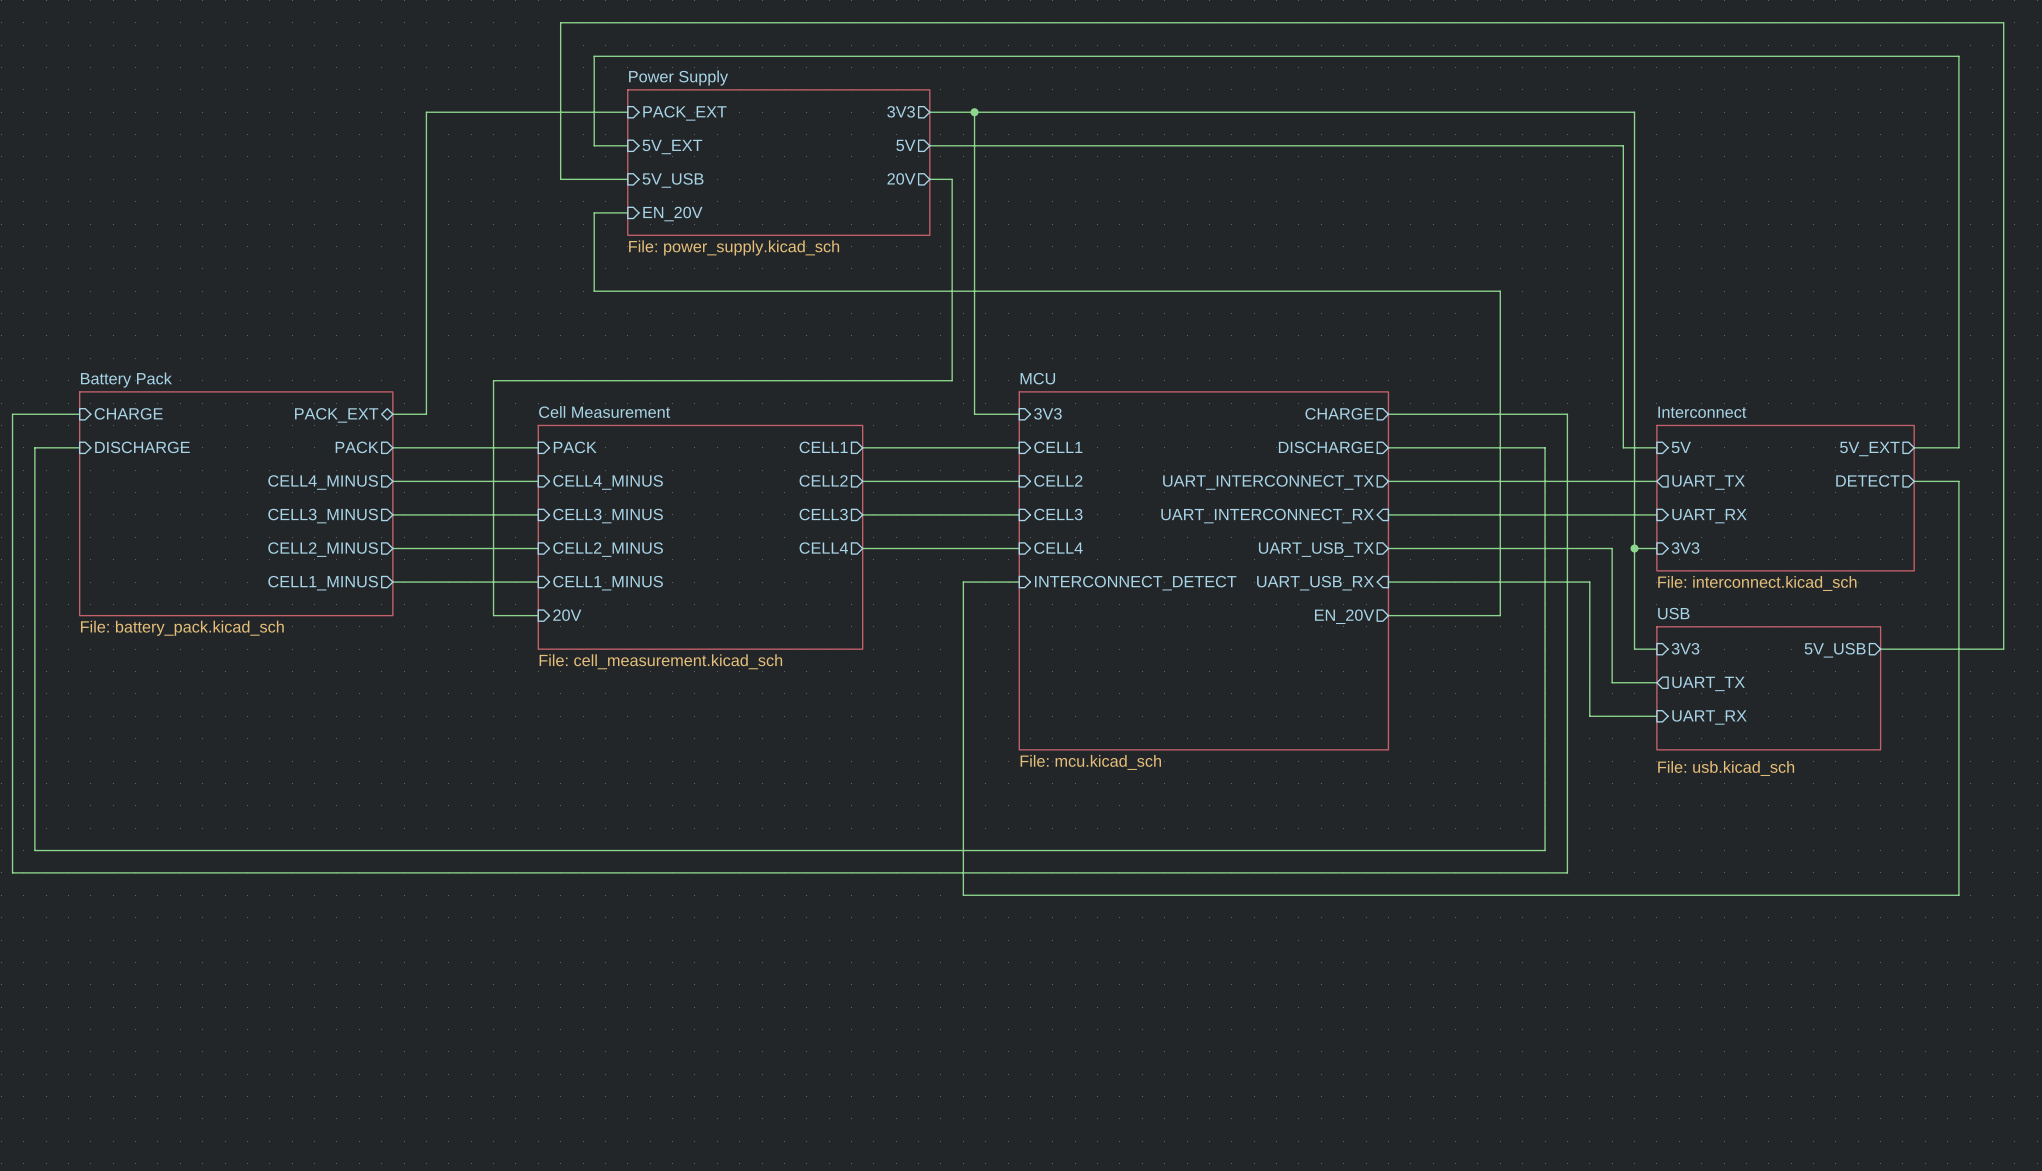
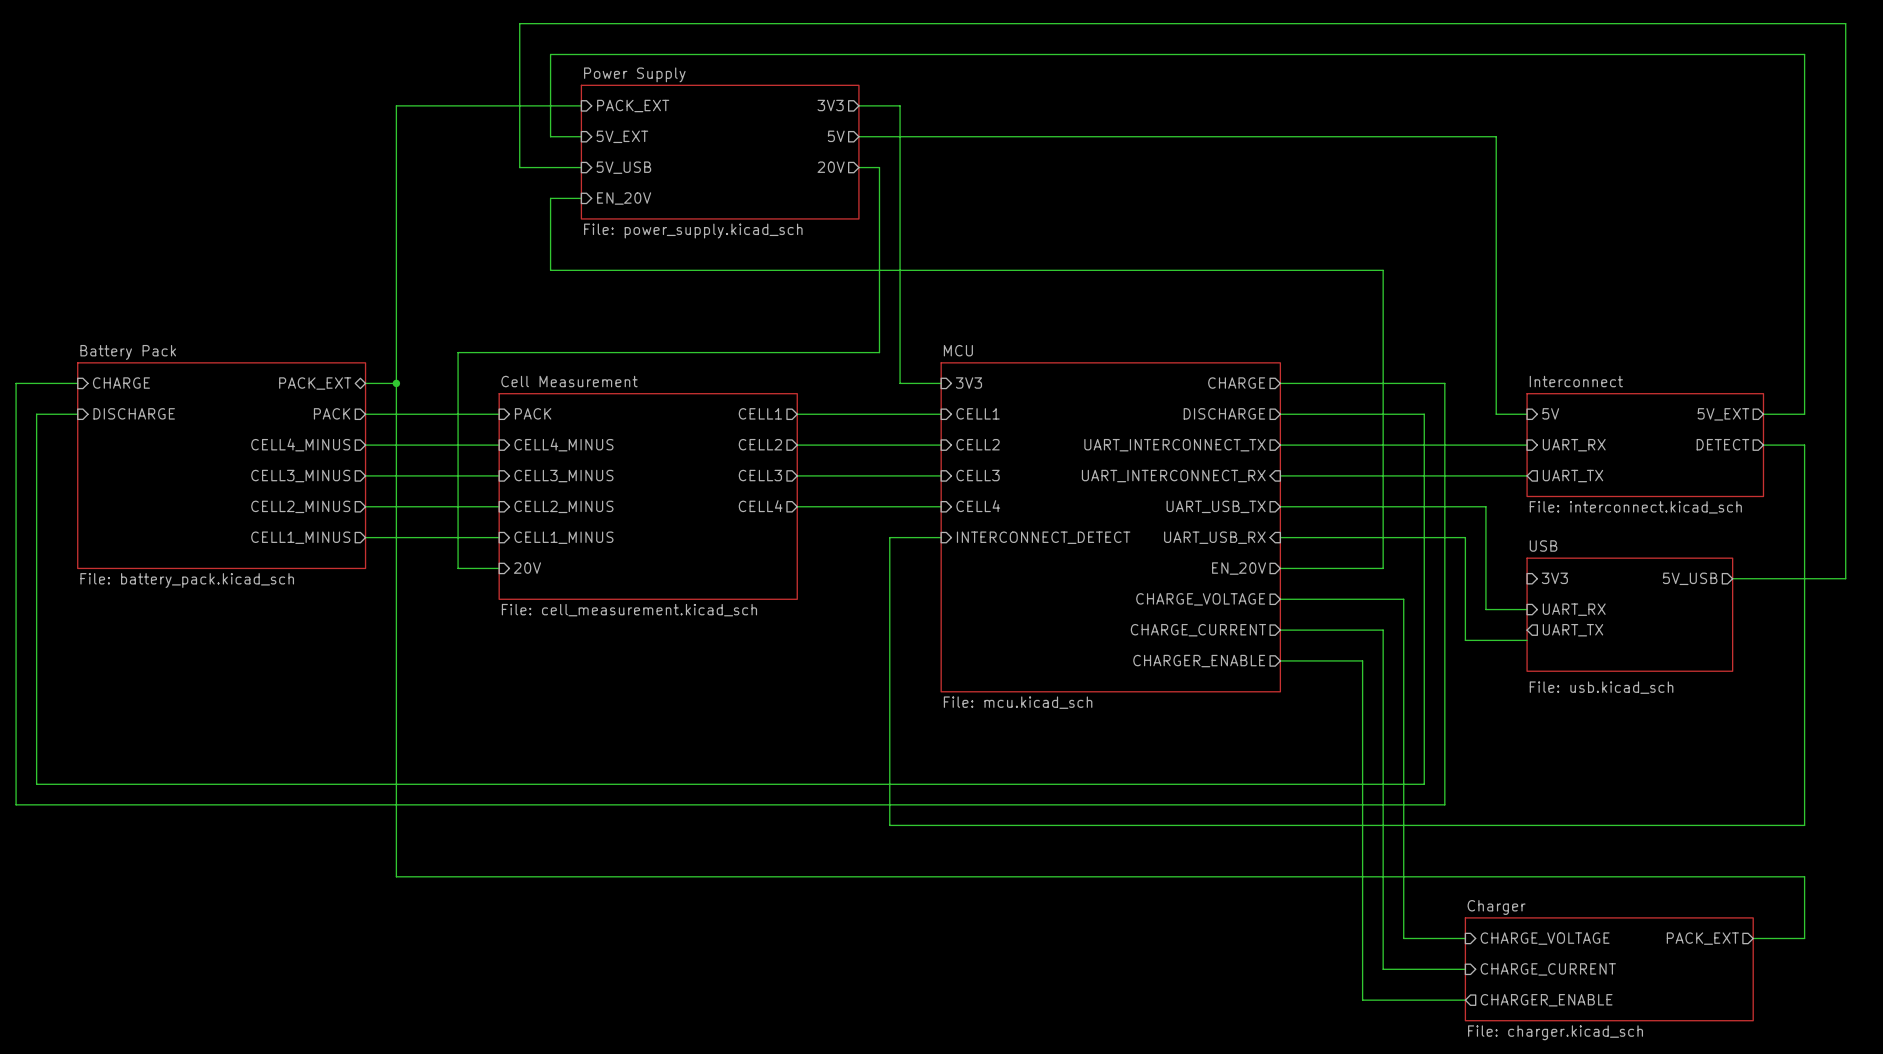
wire: (974, 112) (1634, 112) (1634, 649) (1656, 649) -> none
junction: (974, 112) -> none
wire: none -> (396, 383) (396, 876) (1804, 876) (1804, 938) (1753, 938)
junction: none -> (396, 383)
sheet Interconnect: none -> File: interconnect.kicad_sch (1645, 445)
sheet pin shape: output (1708, 482) -> input (1574, 445)
sheet pin: UART_TX (1708, 482) -> UART_RX (1574, 445)
sheet Interconnect: File: interconnect.kicad_sch (1785, 498) -> none
sheet pin shape: input (1709, 516) -> output (1572, 476)
sheet pin: UART_RX (1709, 516) -> UART_TX (1572, 476)
wire: (1634, 548) (1656, 548) -> none
junction: (1634, 548) -> none
sheet pin: 3V3 (1685, 548) -> none
wire: (2003, 626) (2003, 649) (1880, 649) -> (1845, 578) (1732, 578)
sheet pin position: 3V3 (1685, 648) -> 3V3 (1554, 578)
wire: none -> (1280, 599) (1403, 599) (1403, 938) (1465, 938)
sheet pin: none -> CHARGE_VOLTAGE (1200, 599)
sheet pin position: 5V_USB (1835, 650) -> 5V_USB (1690, 578)
wire: (1612, 660) (1612, 682) (1656, 682) -> (1485, 609) (1527, 609)
wire: none -> (1280, 630) (1383, 630) (1383, 969) (1465, 969)
sheet pin: none -> CHARGE_CURRENT (1198, 630)
sheet USB position: (1768, 688) -> (1629, 614)
wire: (1589, 693) (1589, 716) (1656, 716) -> (1465, 640) (1527, 640)
wire: none -> (1280, 660) (1362, 660) (1362, 1000) (1465, 1000)
sheet pin: none -> CHARGER_ENABLE (1199, 661)
sheet pin position: UART_RX (1709, 717) -> UART_RX (1574, 609)
sheet pin: none -> CHARGE_VOLTAGE (1545, 938)
sheet pin: none -> PACK_EXT (1702, 938)
sheet Charger: none -> File: charger.kicad_sch (1609, 969)
sheet pin: none -> CHARGE_CURRENT (1548, 969)
sheet pin: none -> CHARGER_ENABLE (1546, 1000)

